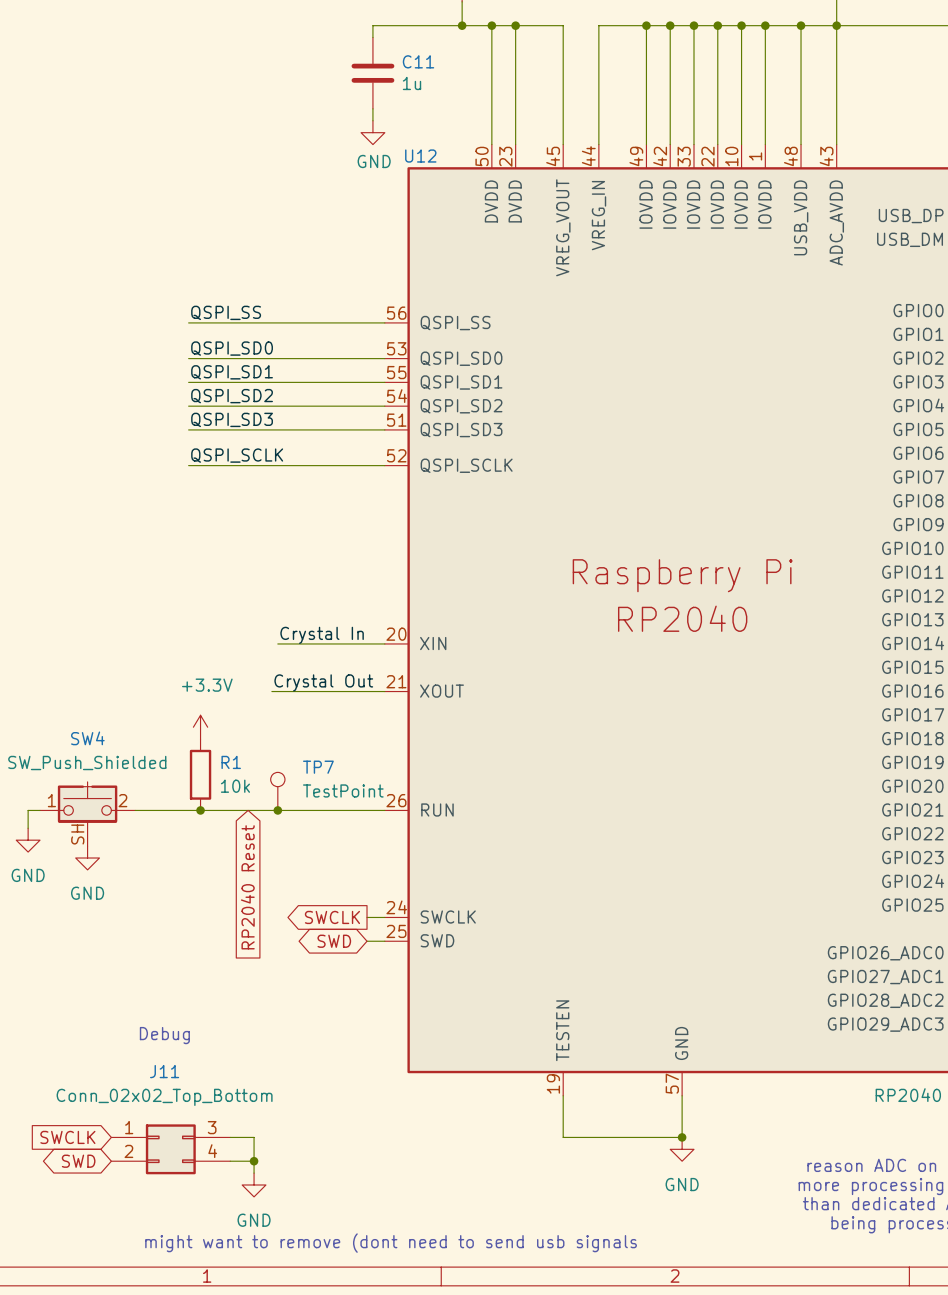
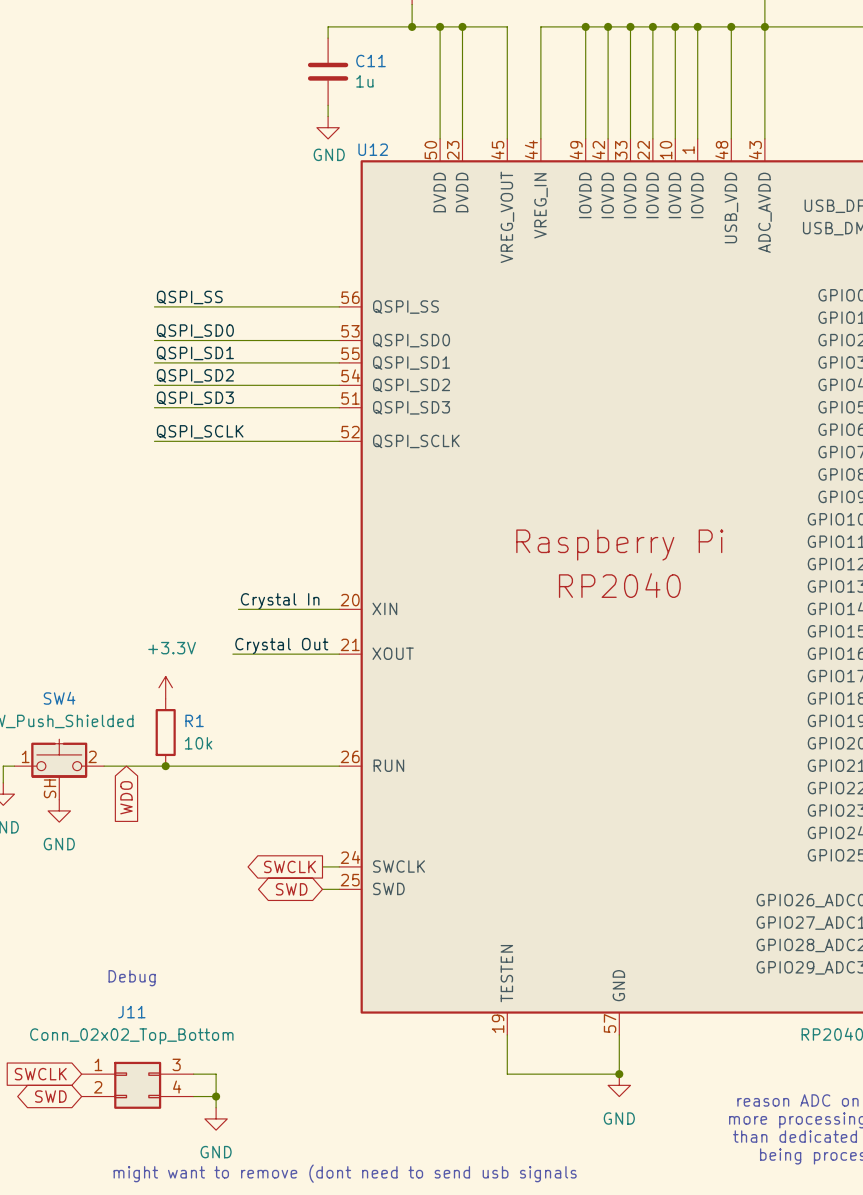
TP7: TestPoint (277, 791) -> none
junction: (277, 810) -> none
global label: none -> WDO (126, 797)
global label: RP2040 Reset (247, 887) -> none

